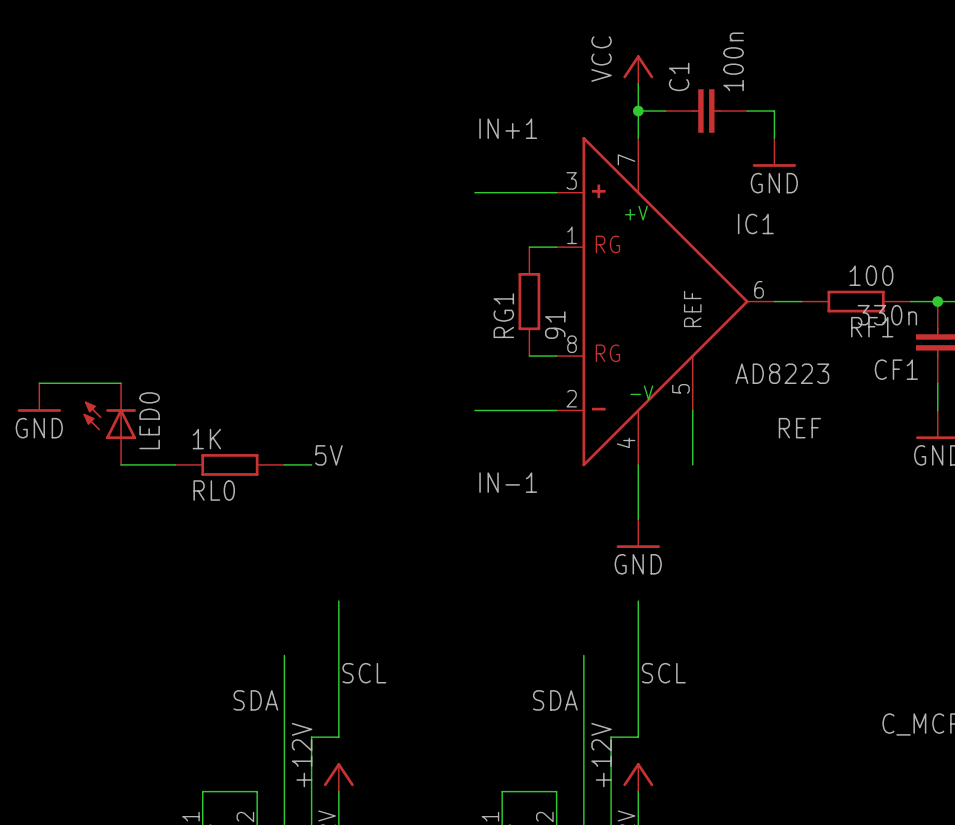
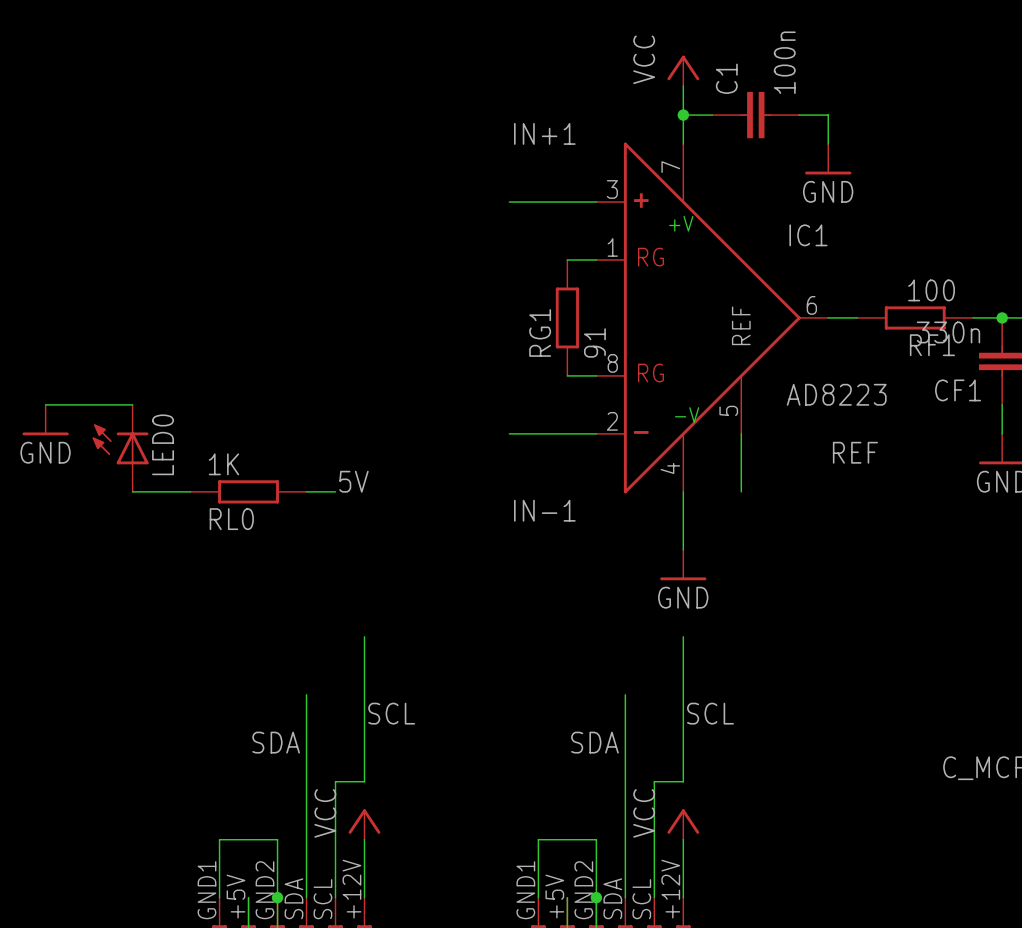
power symbol: +12V (338, 777) -> VCC (364, 824)
power symbol: +12V (638, 777) -> VCC (683, 824)

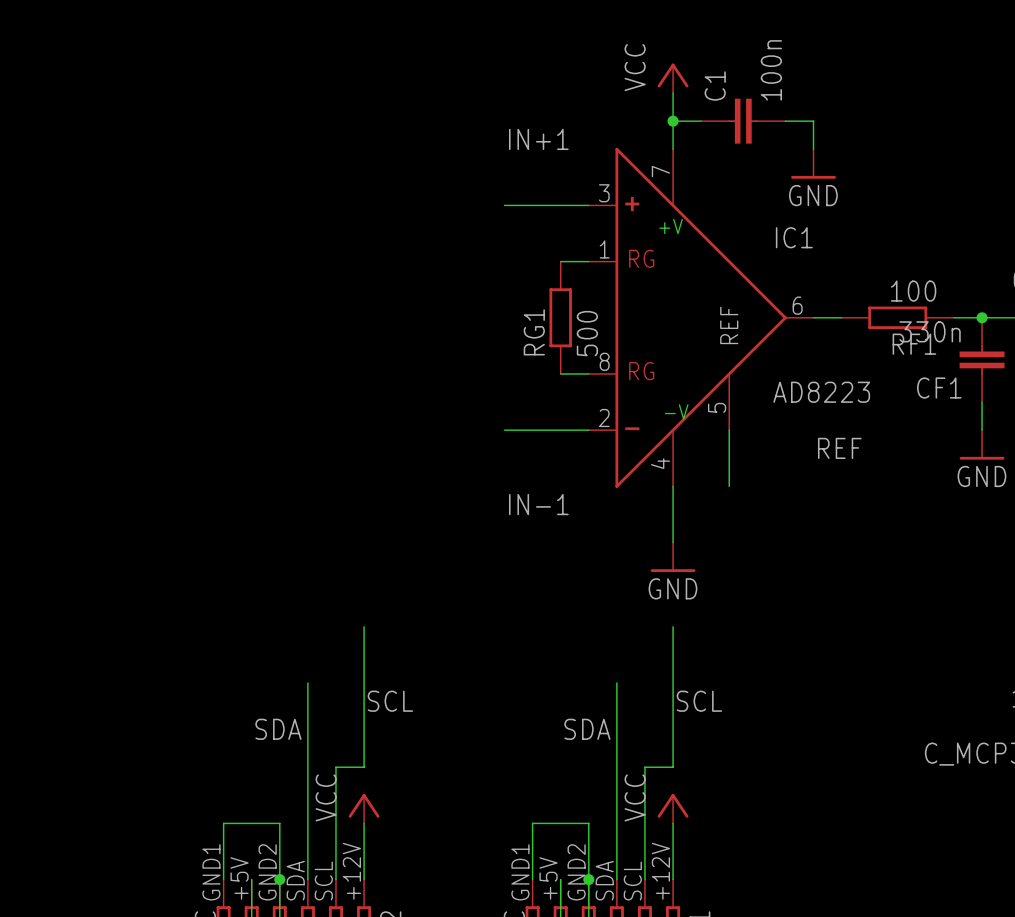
RG1 value: 91 (594, 342) -> 500 (587, 333)
wire: (45, 404) (132, 404) -> none
power symbol: GND (45, 420) -> none
LED0: (120, 448) -> none
label: 5V (353, 481) -> none
wire: (132, 491) (190, 491) -> none
RL0: 1K (248, 491) -> none
wire: (306, 491) (335, 491) -> none

